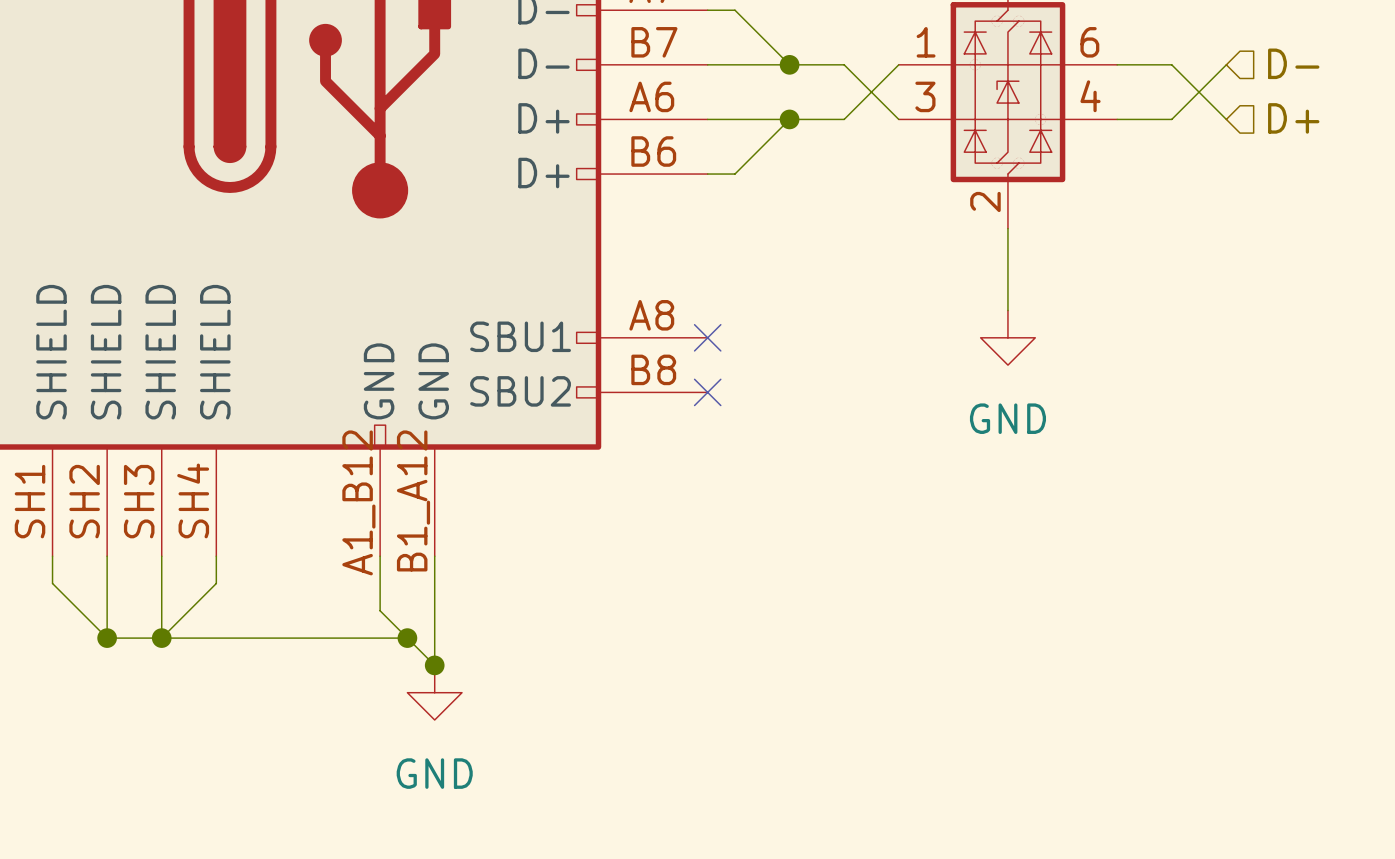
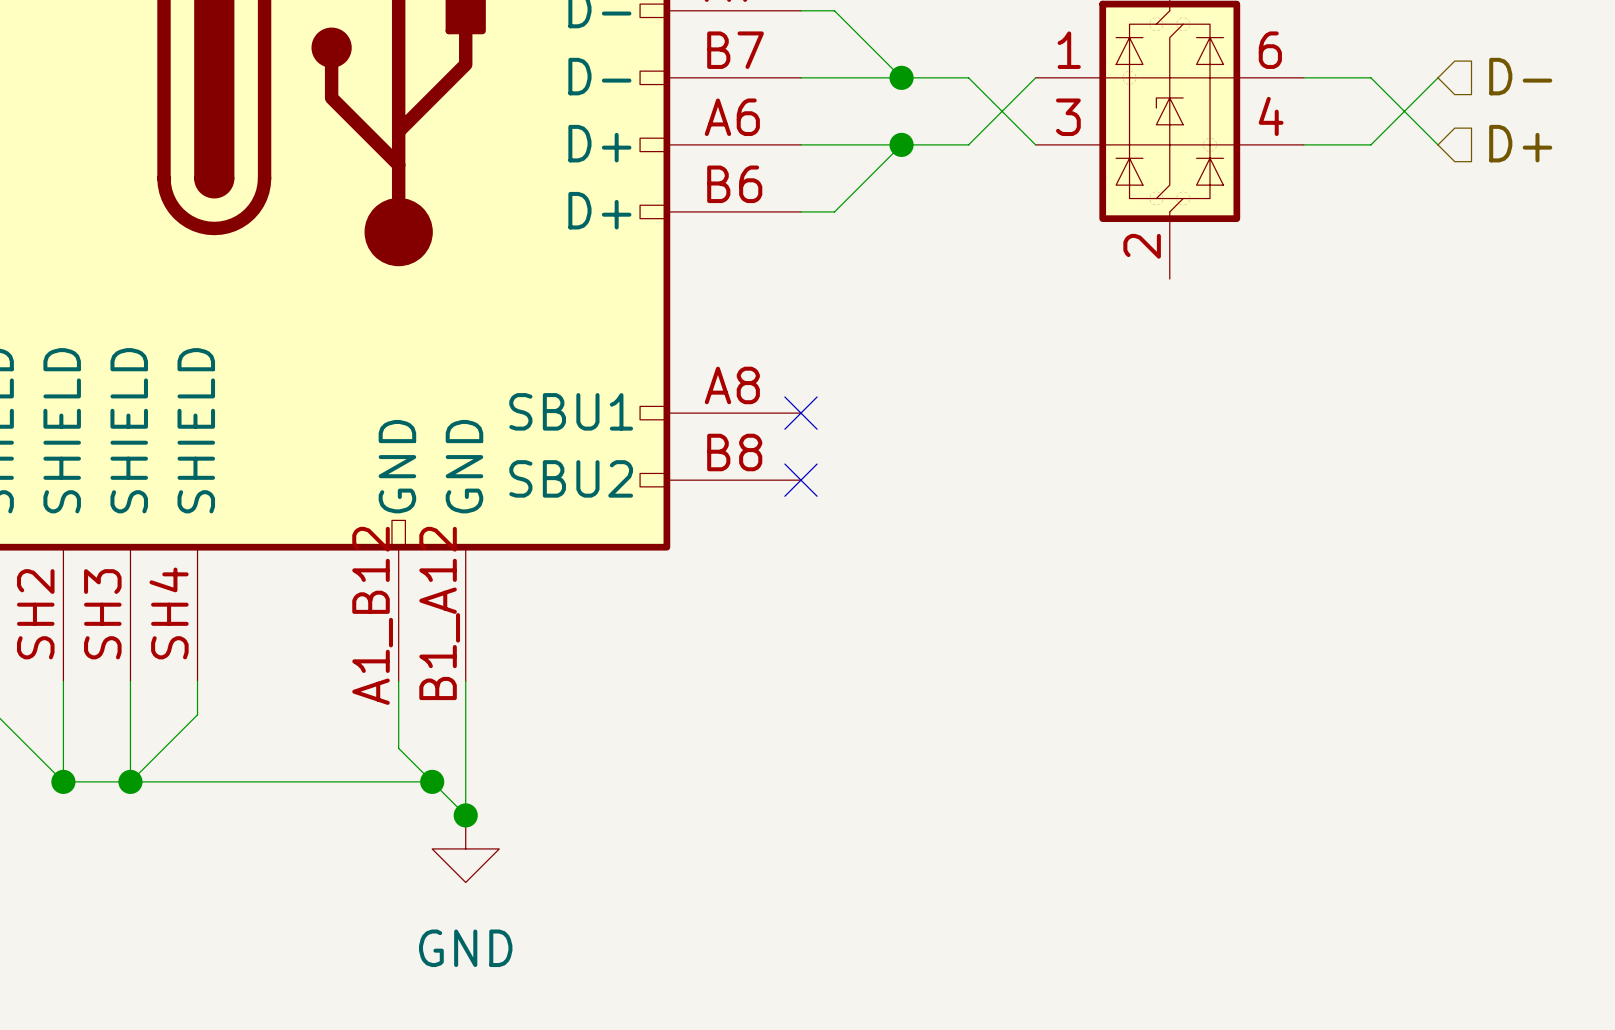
wire: (1007, 228) (1007, 310) -> none
power symbol: GND (1007, 337) -> none

